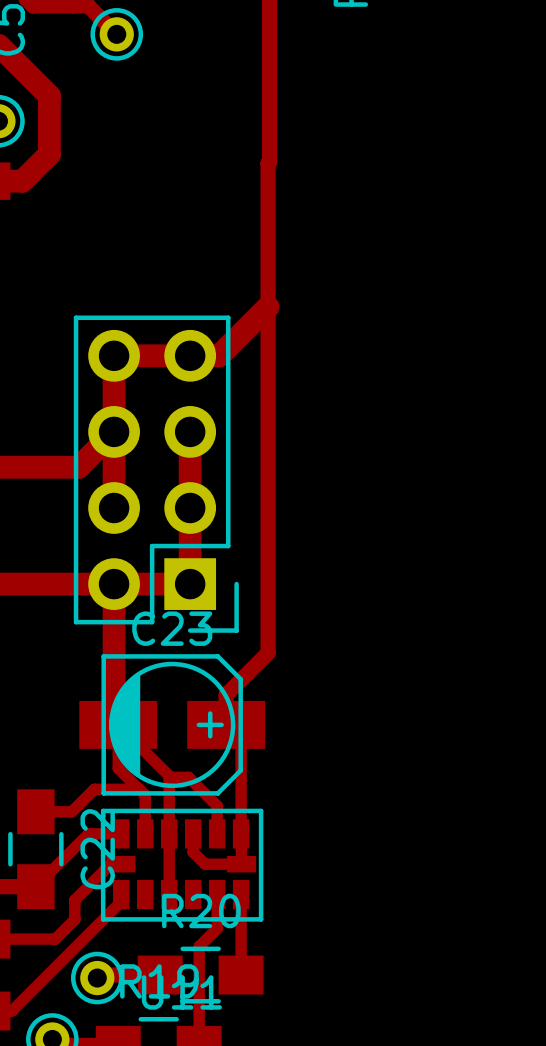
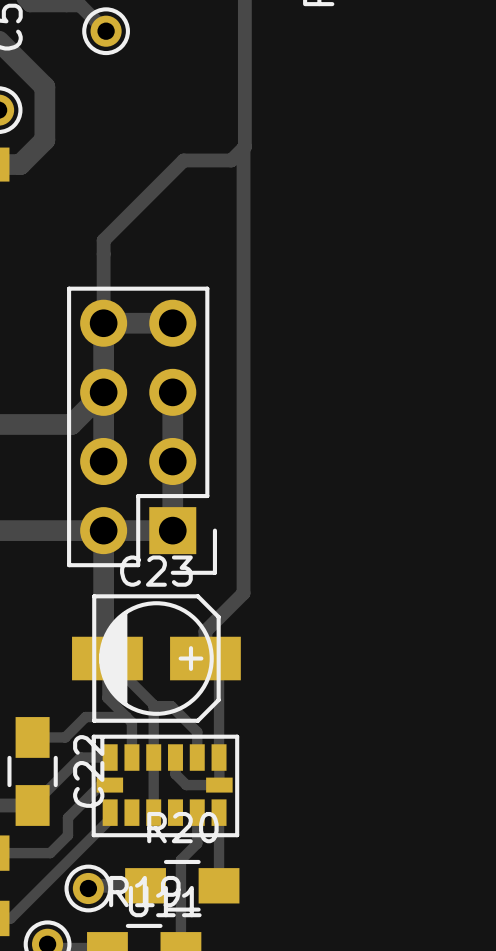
track: none -> (243, 148) (231, 160) (183, 160) (103, 240) (103, 323)
track: (268, 306) (219, 355) (190, 355) -> none

